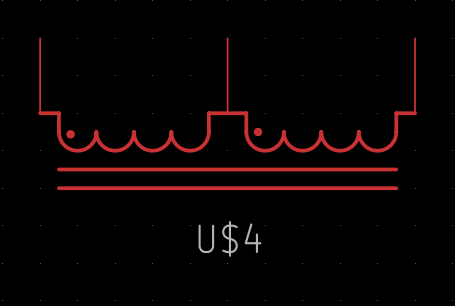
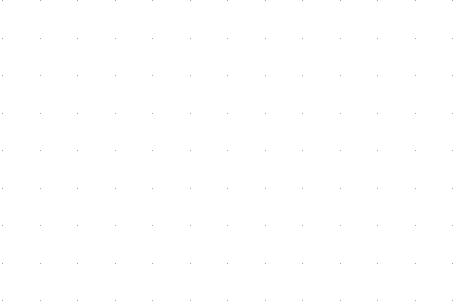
U$4: (227, 114) -> none

